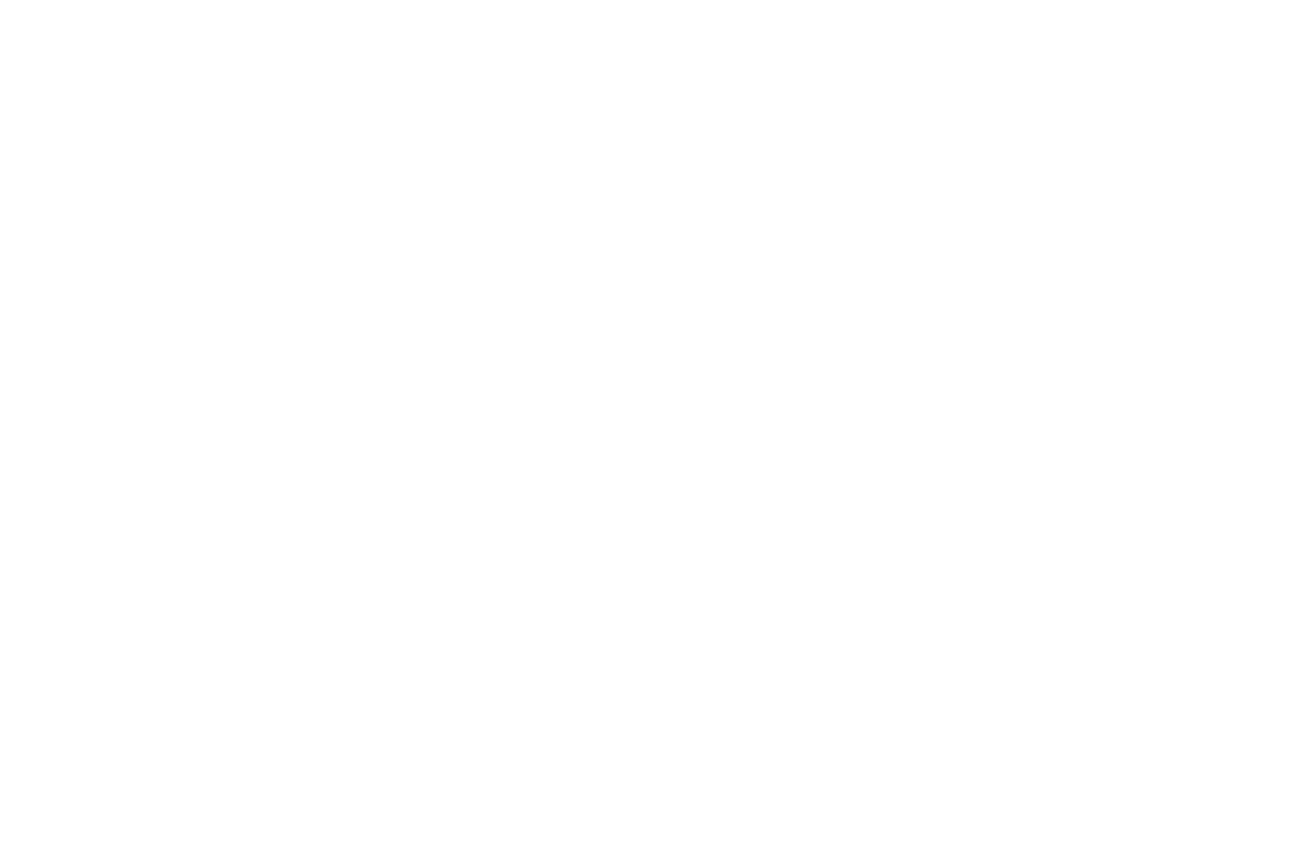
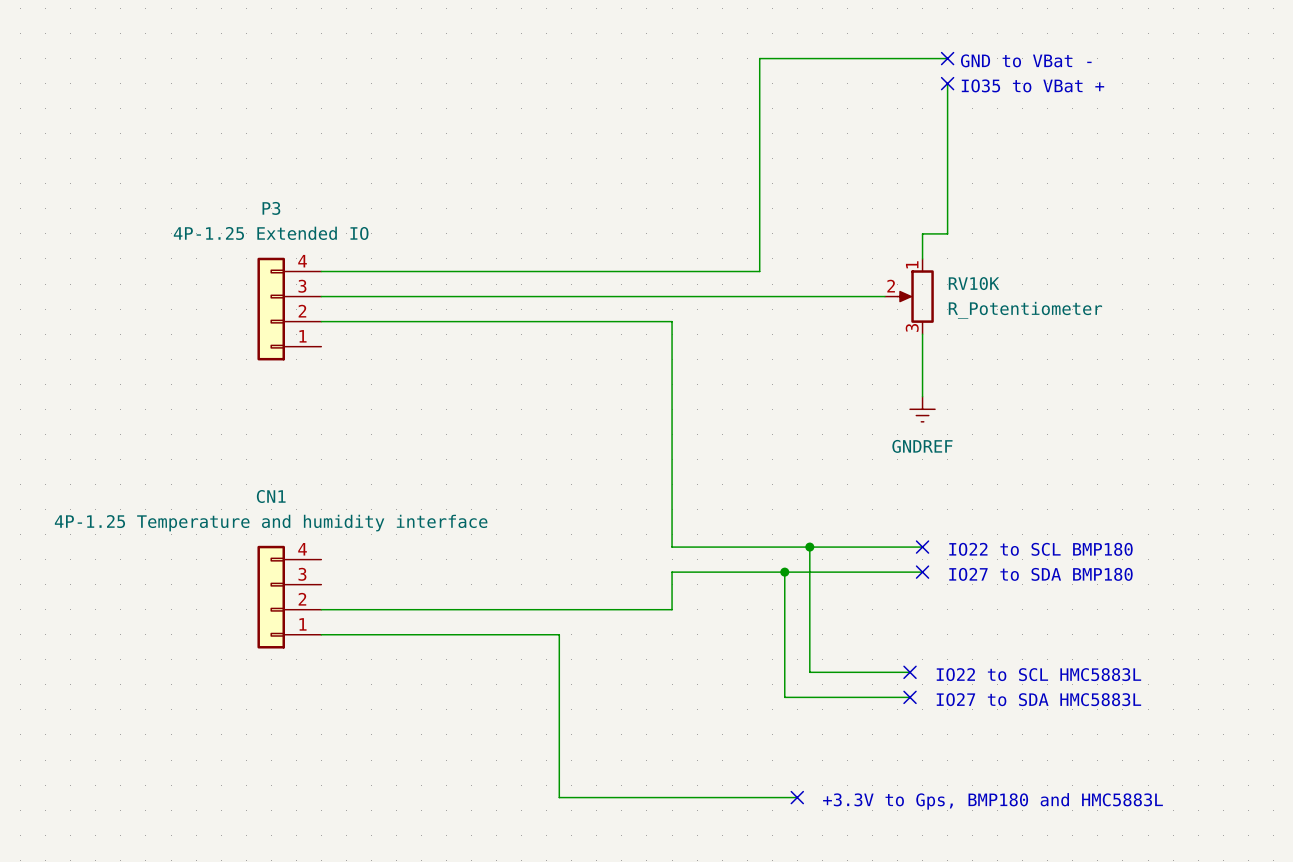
wire: none -> (947, 58) (759, 58) (759, 271) (321, 271)
no-connect mark: none -> (947, 58)
text: none -> GND to VBat - (1026, 60)
wire: none -> (947, 83) (947, 233) (922, 233) (922, 258)
no-connect mark: none -> (947, 83)
text: none -> IO35 to VBat + (1032, 85)
wire: none -> (321, 296) (884, 296)
RV10K: none -> R_Potentiometer (909, 296)
P3: none -> 4P-1.25 Extended IO (289, 309)
wire: none -> (321, 321) (672, 321) (672, 547) (922, 547)
wire: none -> (922, 334) (922, 396)
power symbol: none -> GNDREF (922, 409)
wire: none -> (809, 547) (809, 672) (910, 672)
junction: none -> (809, 547)
no-connect mark: none -> (922, 547)
text: none -> IO22 to SCL BMP180 (1040, 549)
wire: none -> (784, 572) (784, 697) (910, 697)
junction: none -> (784, 572)
wire: none -> (922, 572) (672, 572) (672, 609) (321, 609)
no-connect mark: none -> (922, 572)
text: none -> IO27 to SDA BMP180 (1040, 574)
CN1: none -> 4P-1.25 Temperature and humidity interface (289, 597)
wire: none -> (321, 634) (559, 634) (559, 797) (797, 797)
no-connect mark: none -> (910, 672)
text: none -> IO22 to SCL HMC5883L (1038, 674)
no-connect mark: none -> (910, 697)
text: none -> IO27 to SDA HMC5883L (1038, 699)
no-connect mark: none -> (797, 797)
text: none -> +3.3V to Gps, BMP180 and HMC5883L (992, 801)

